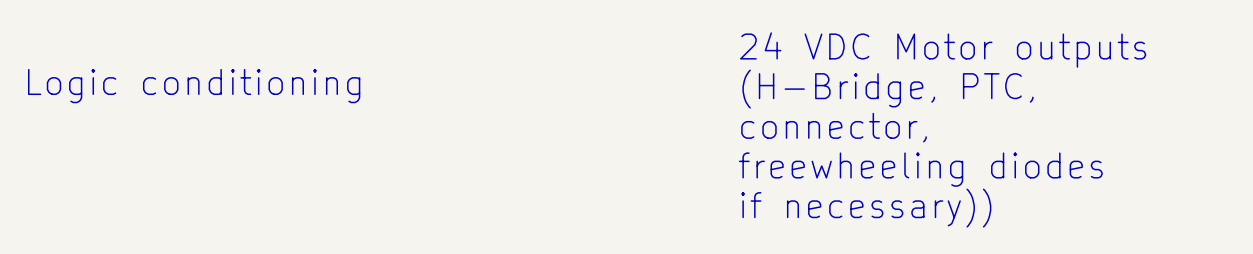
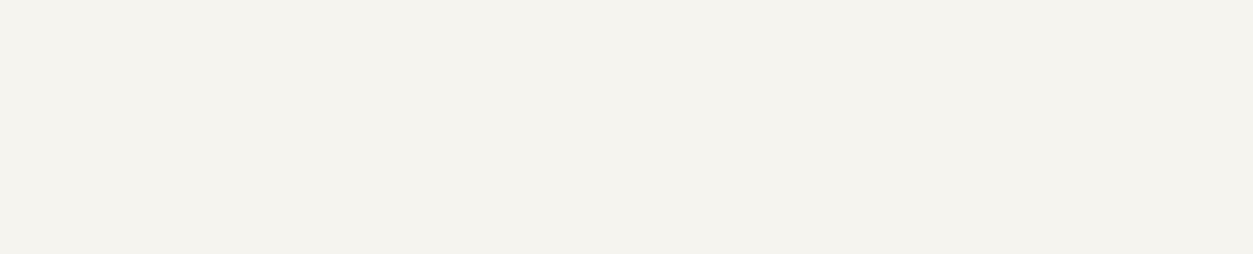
text: 24 VDC Motor outputs (943, 50) -> none
text: Logic conditioning (194, 86) -> none
text: (H-Bridge, PTC, (887, 89) -> none
text: connector, (834, 127) -> none
text: freewheeling diodes (920, 169) -> none
text: if necessary)) (866, 208) -> none

